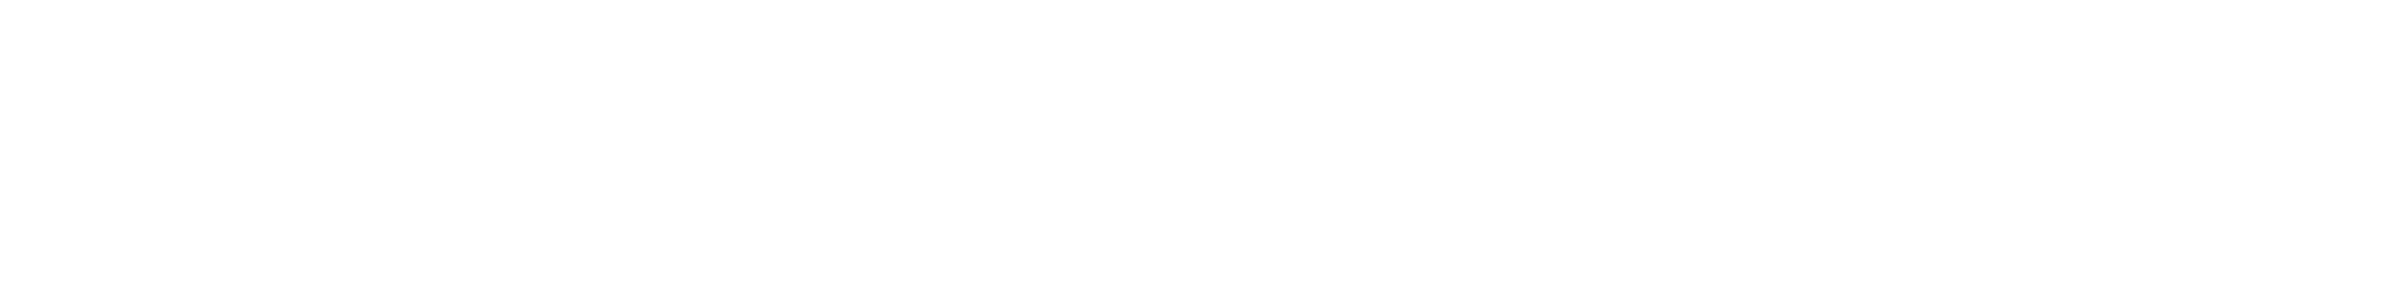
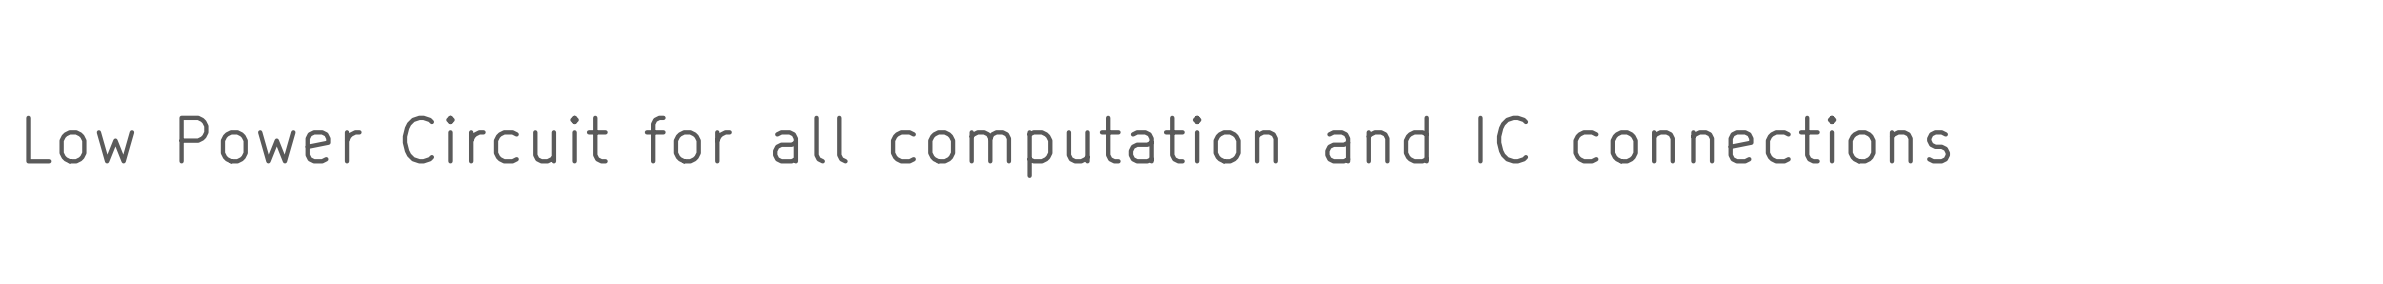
text: none -> Low Power Circuit for all computation and IC connections (988, 146)

